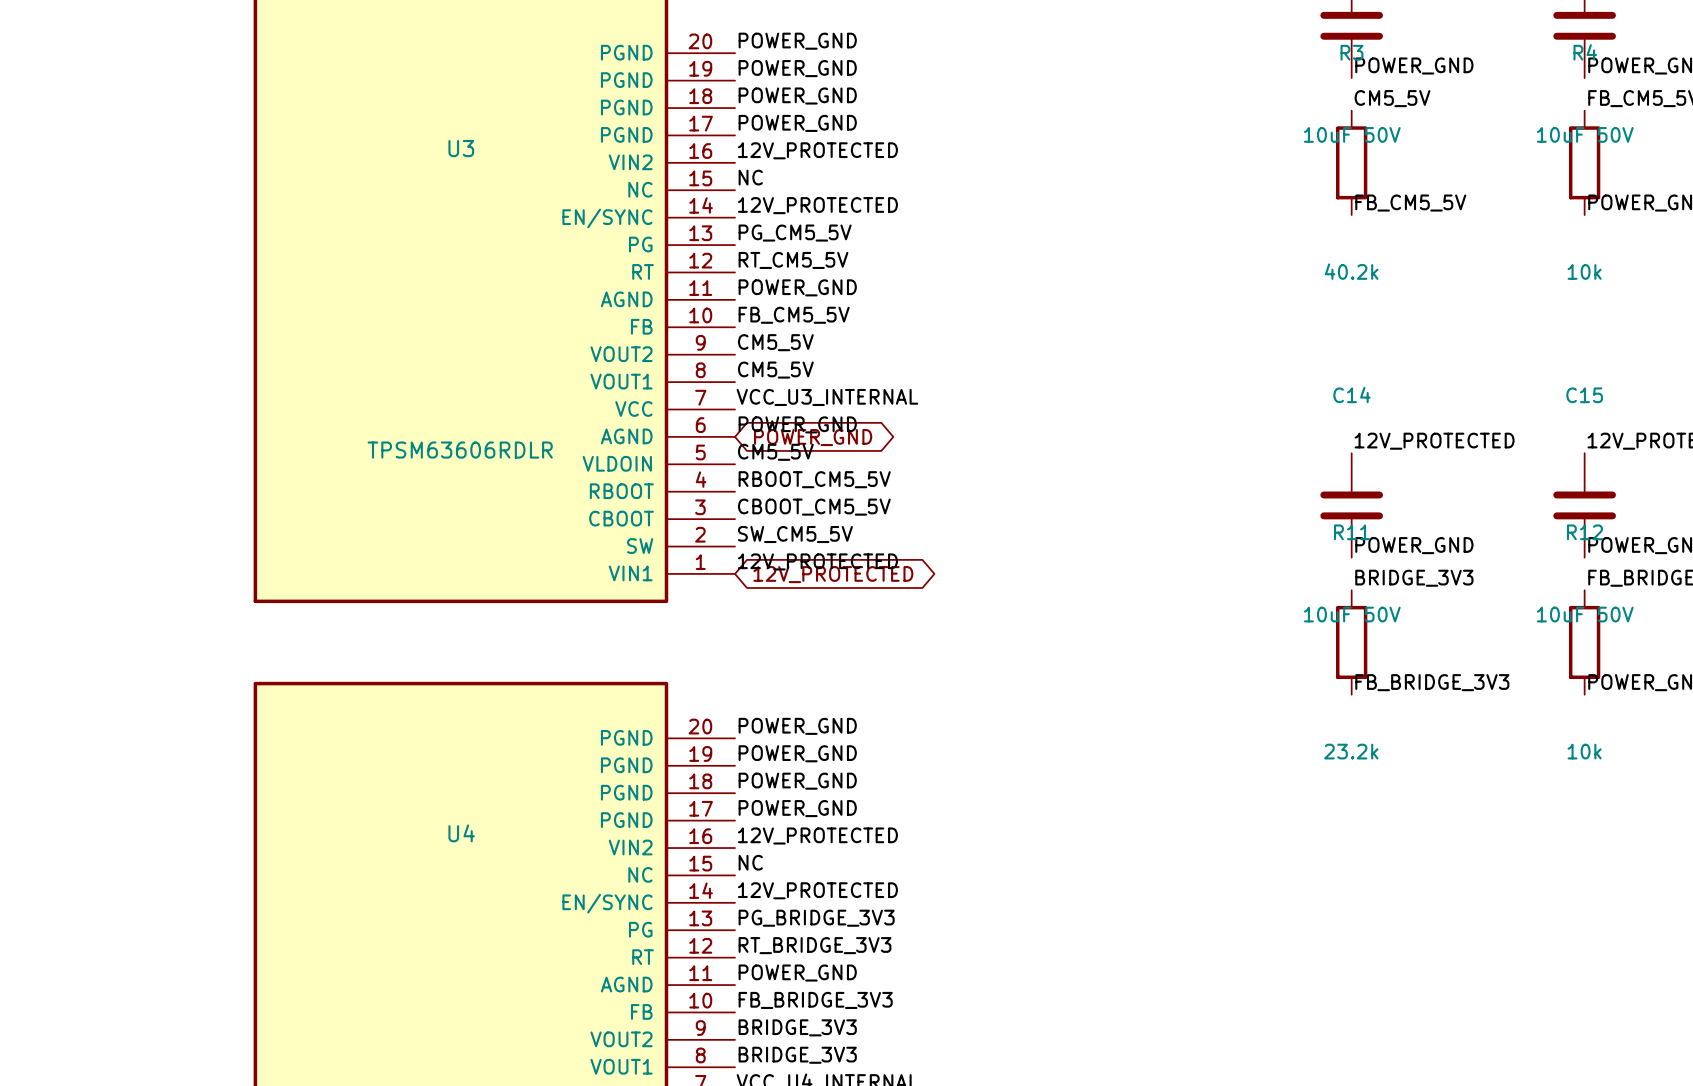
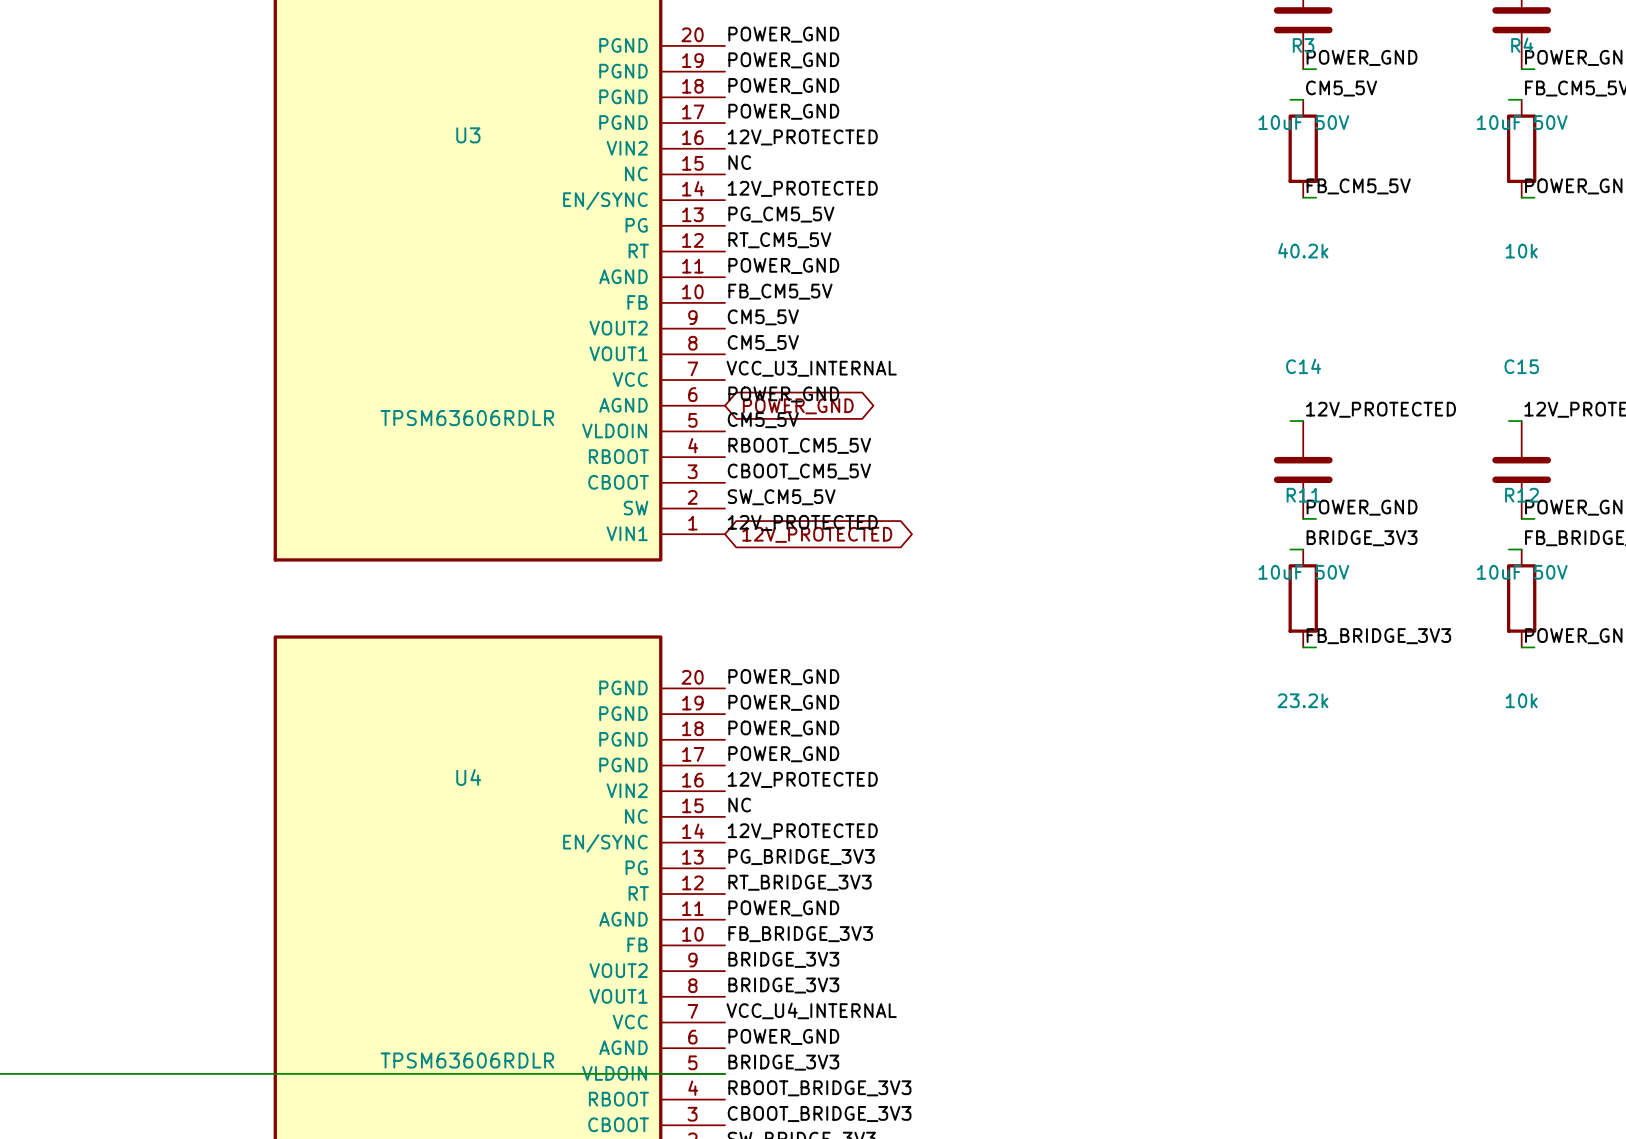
wire: none -> (1303, 69) (1316, 69)
wire: none -> (1521, 69) (1534, 69)
wire: none -> (1290, 99) (1303, 99)
wire: none -> (1508, 99) (1521, 99)
wire: none -> (1303, 197) (1316, 197)
wire: none -> (1521, 197) (1534, 197)
wire: none -> (1290, 421) (1303, 421)
wire: none -> (1508, 421) (1521, 421)
wire: none -> (1303, 518) (1316, 518)
wire: none -> (1521, 518) (1534, 518)
wire: none -> (1290, 549) (1303, 549)
wire: none -> (1508, 549) (1521, 549)
wire: none -> (1303, 647) (1316, 647)
wire: none -> (1521, 647) (1534, 647)

